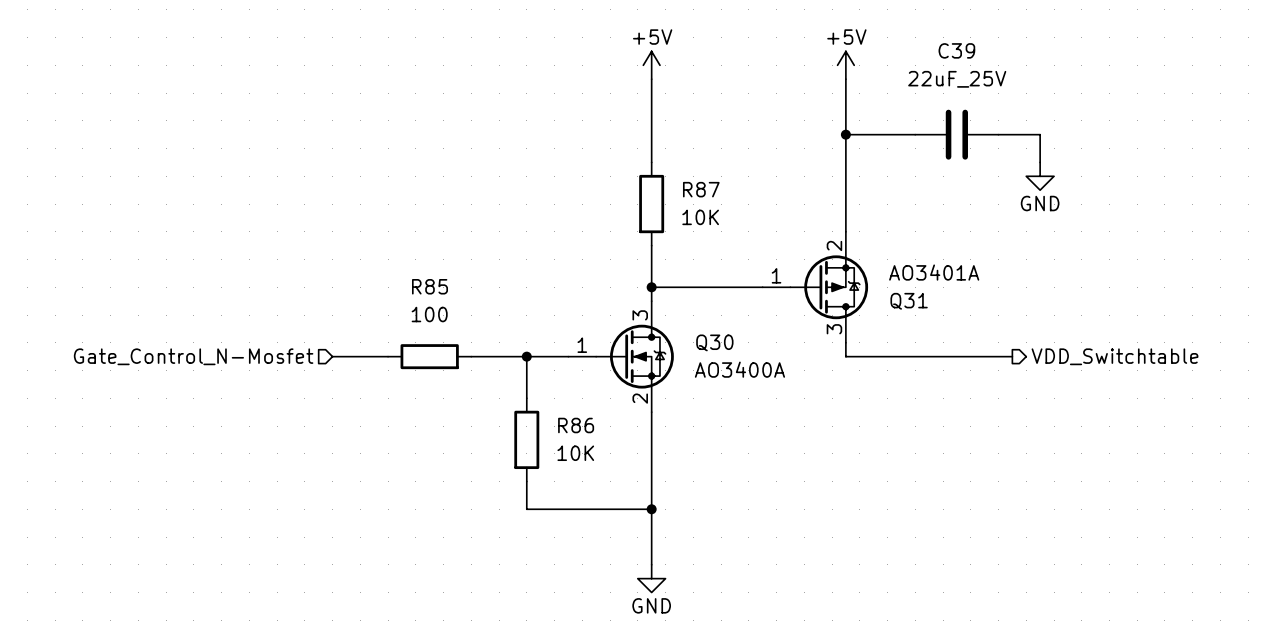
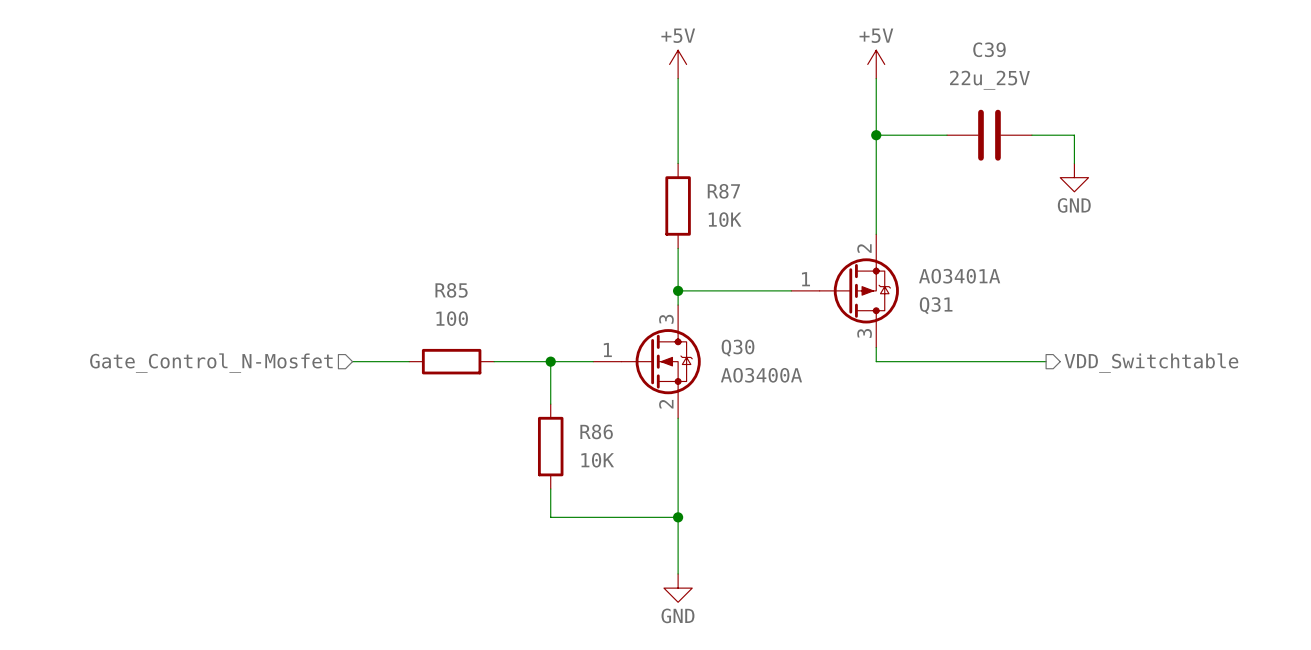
C39 value: 22uF_25V (957, 79) -> 22u_25V (989, 80)

